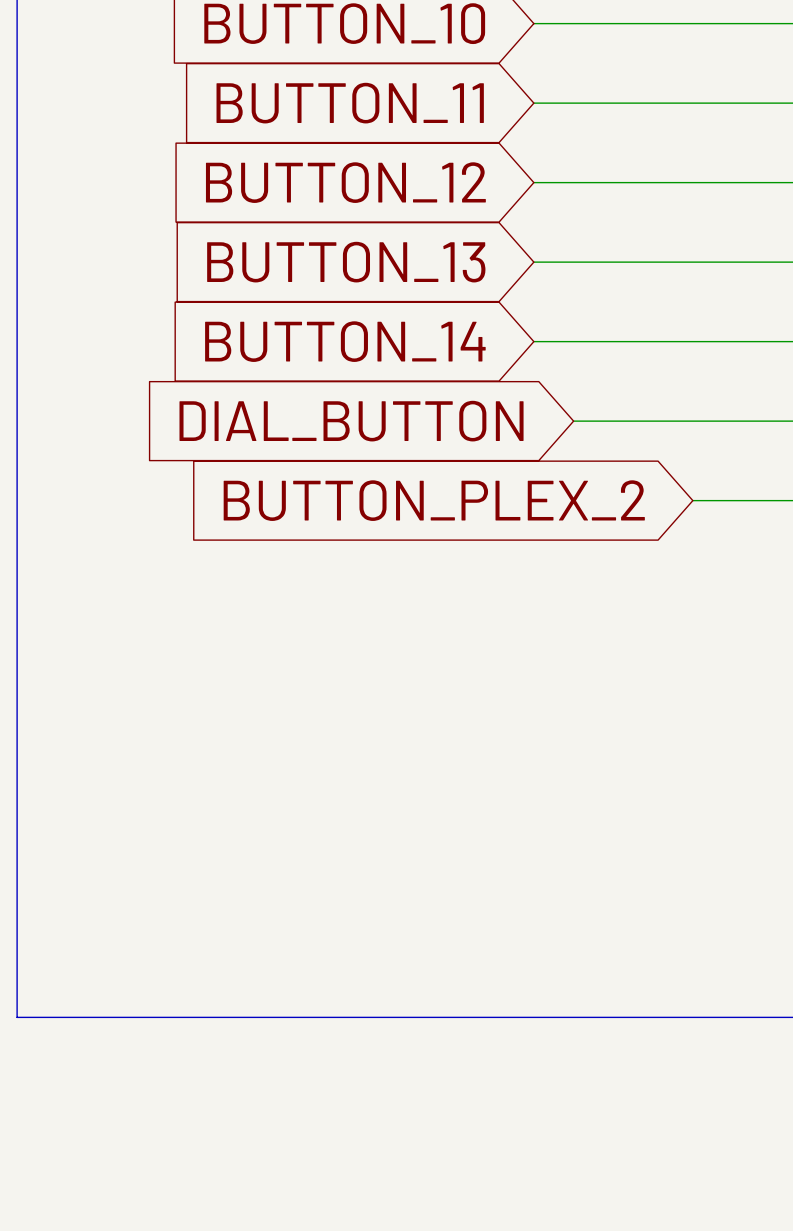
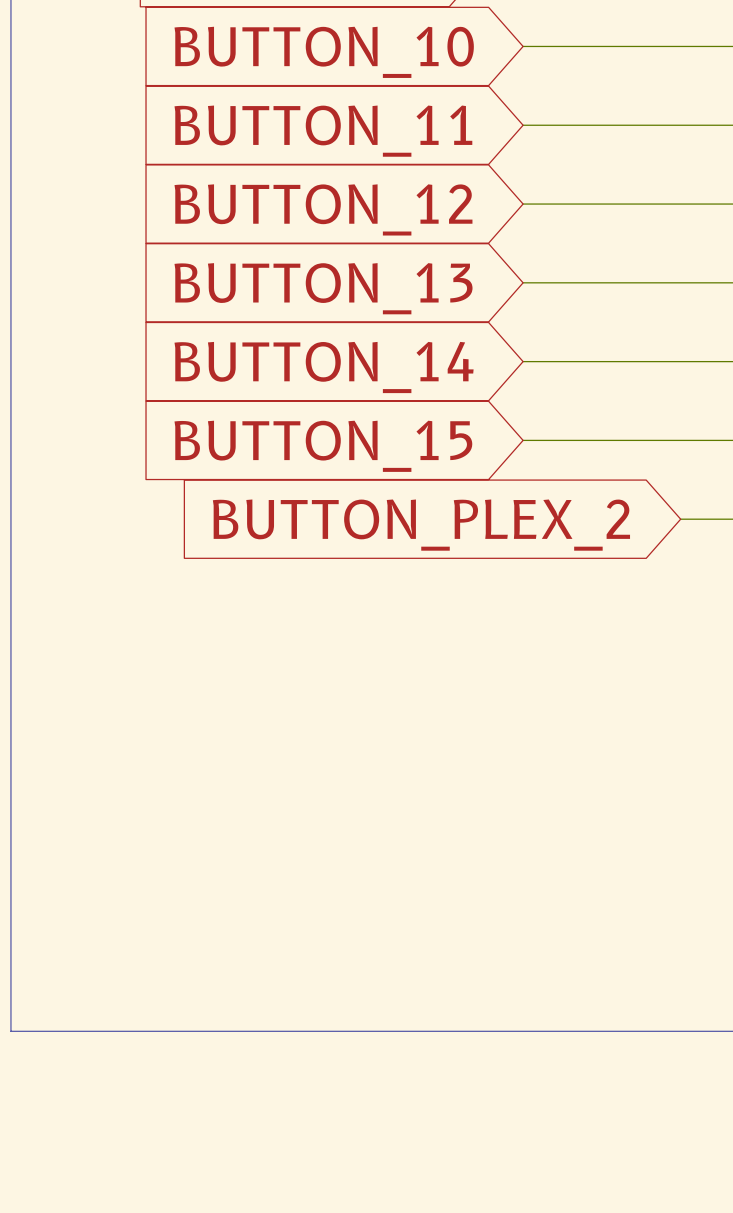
global label: none -> BUTTON_15 (323, 446)
global label: DIAL_BUTTON (351, 421) -> none
wire: none -> (523, 440) (562, 440)

